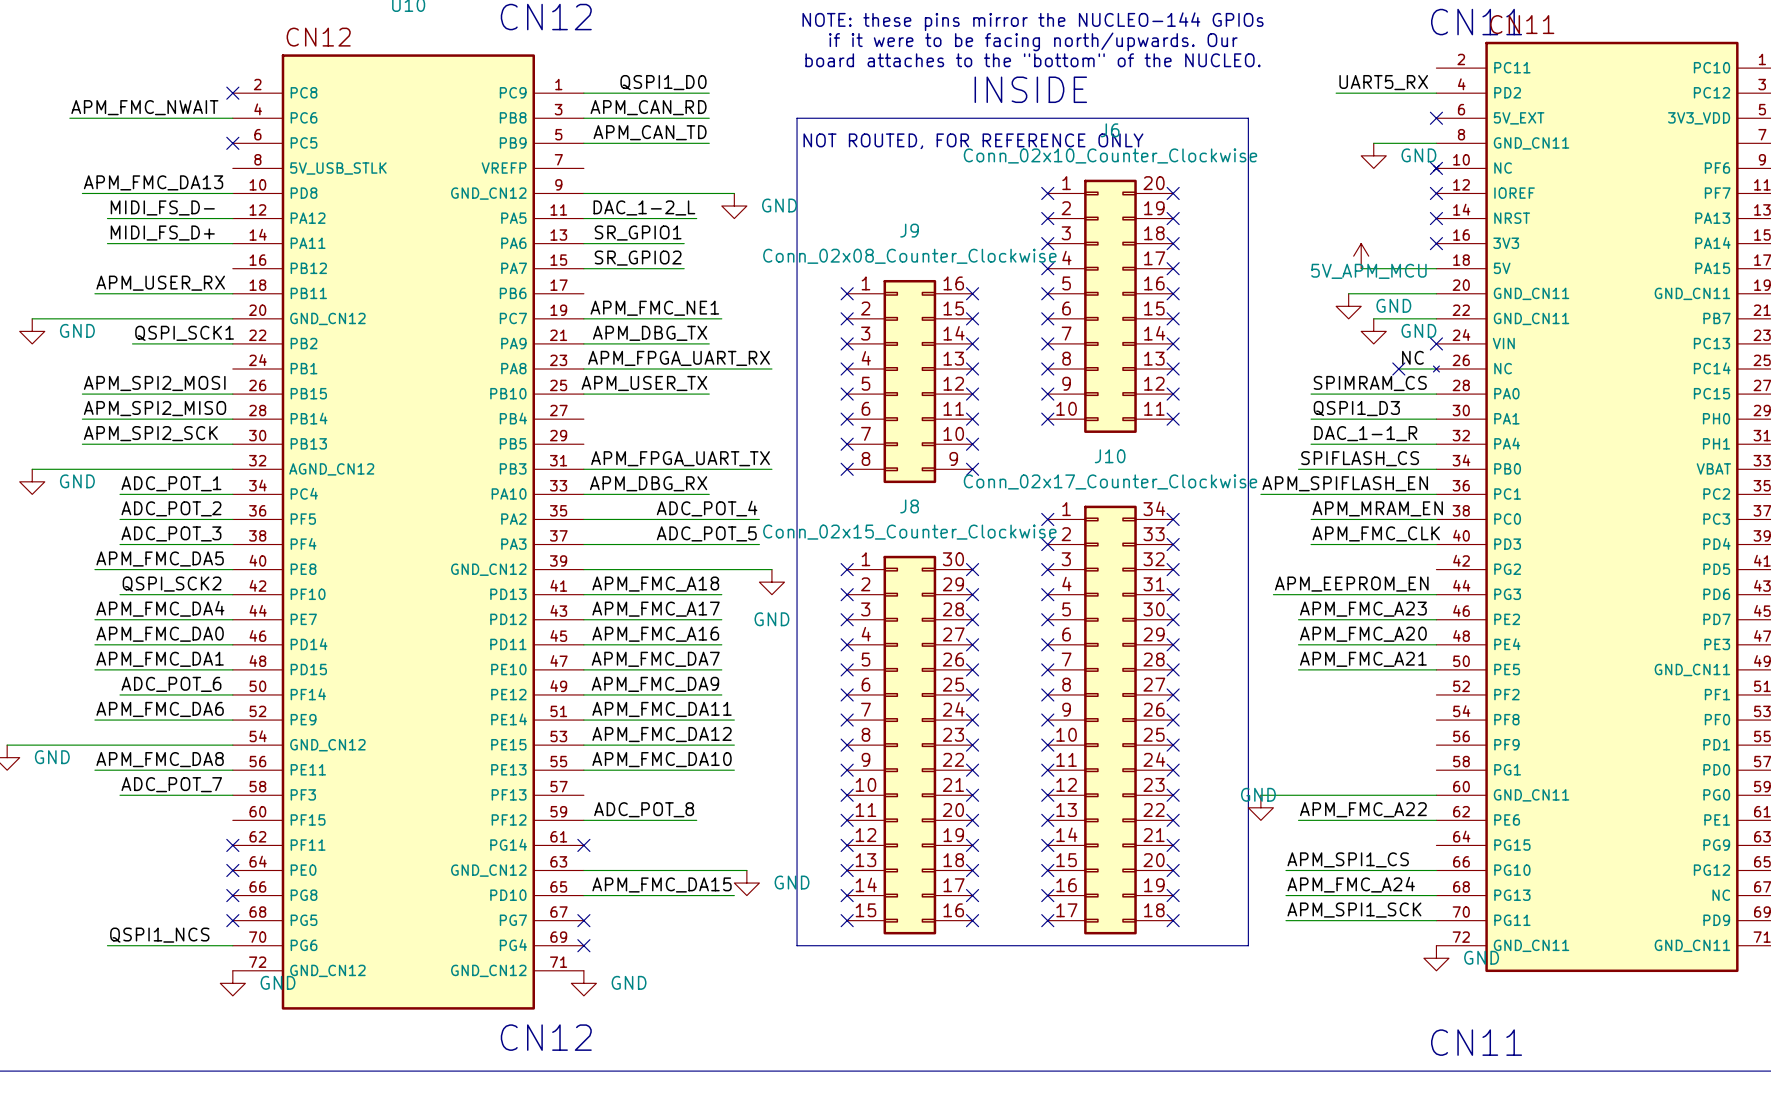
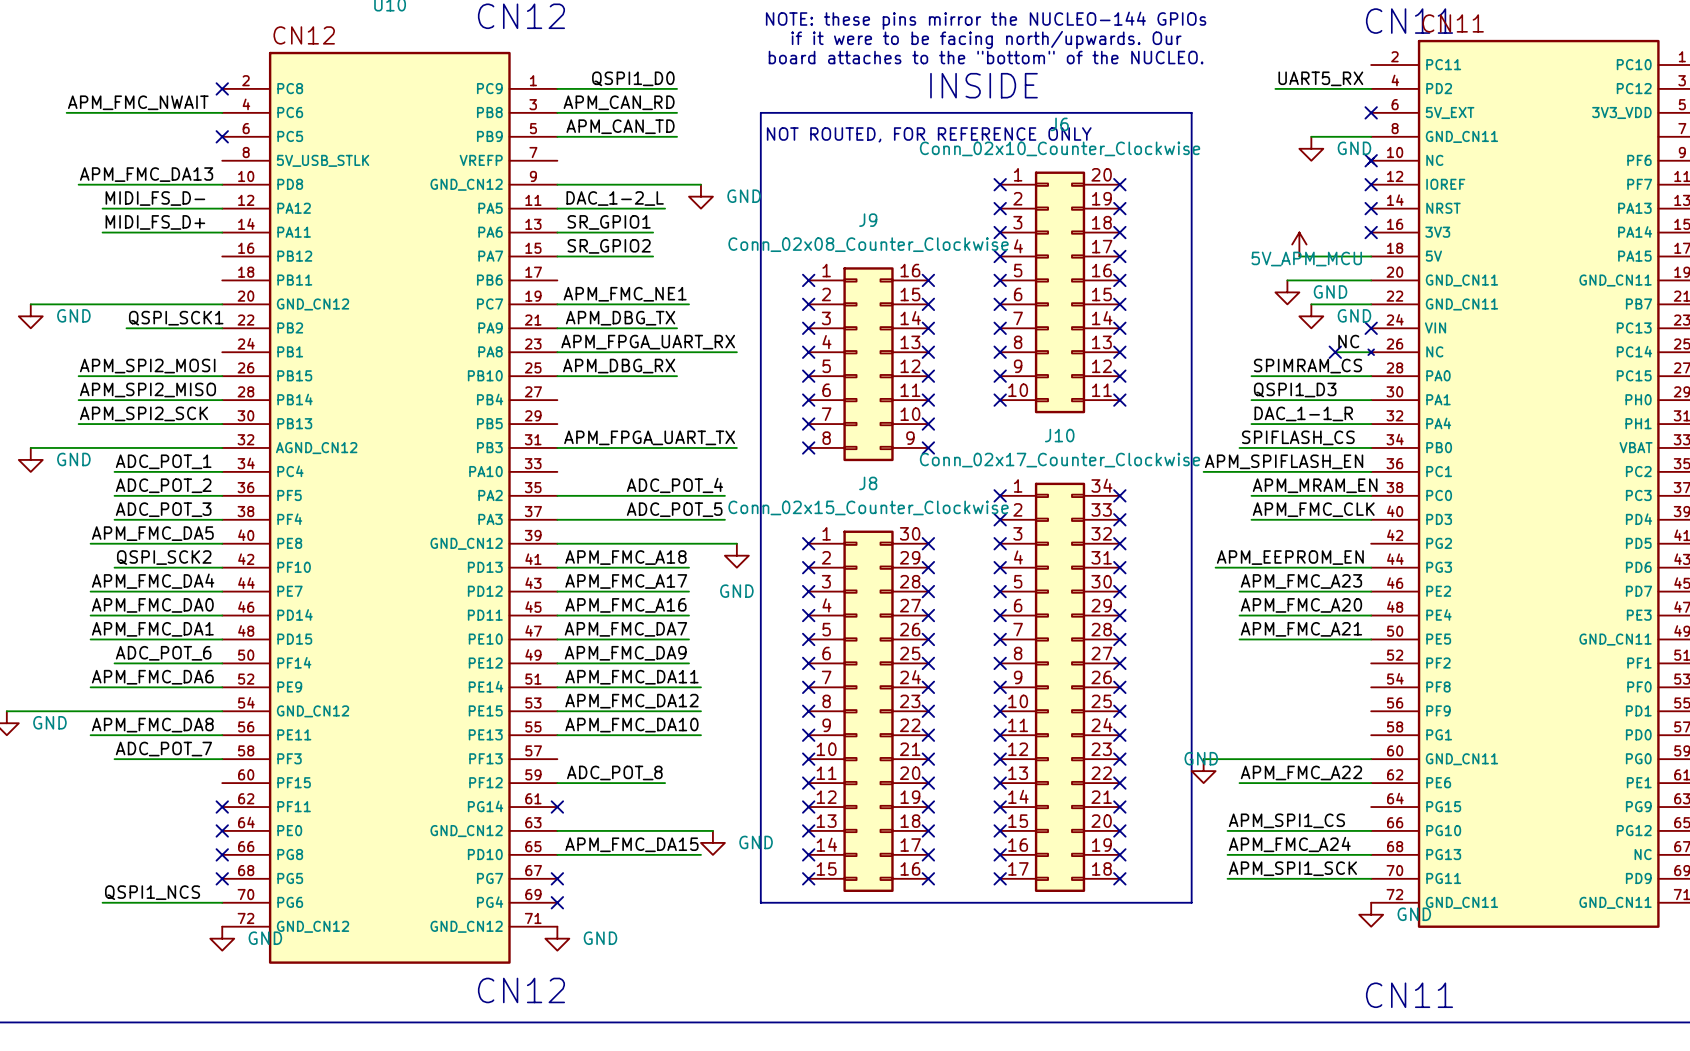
label: APM_USER_RX (160, 283) -> none
wire: (94, 293) (232, 293) -> none
label: APM_USER_TX (644, 383) -> APM_DBG_RX (619, 366)
label: APM_DBG_RX (648, 483) -> none
wire: (583, 494) (709, 494) -> none

